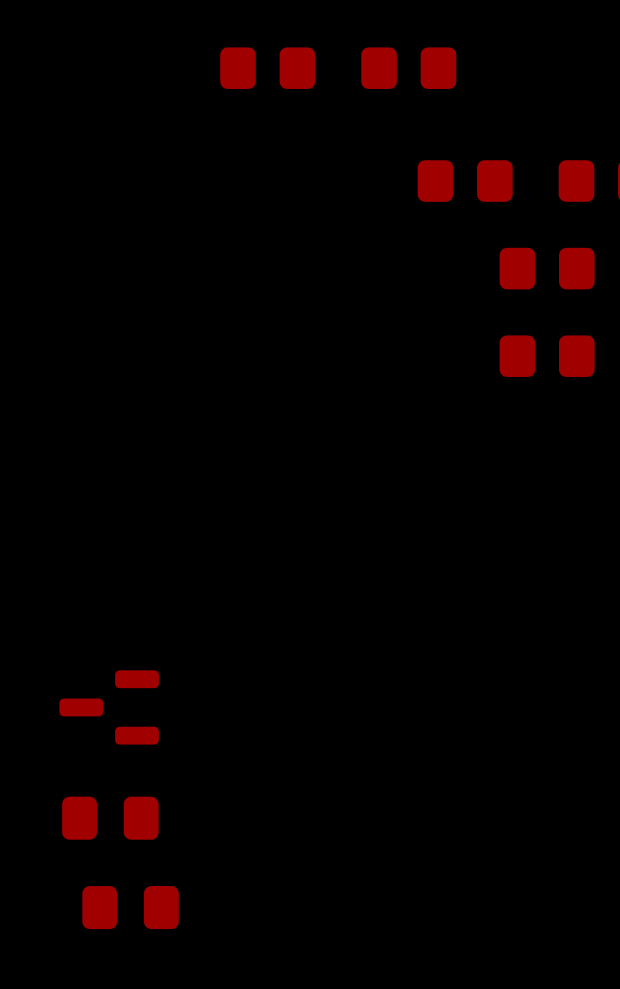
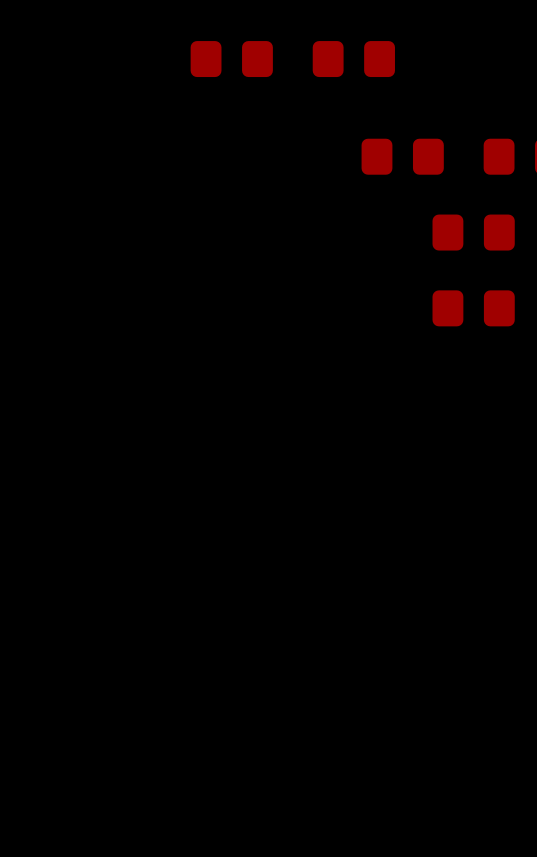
part: (109, 707) -> none
part: (110, 818) -> none
part: (130, 907) -> none

